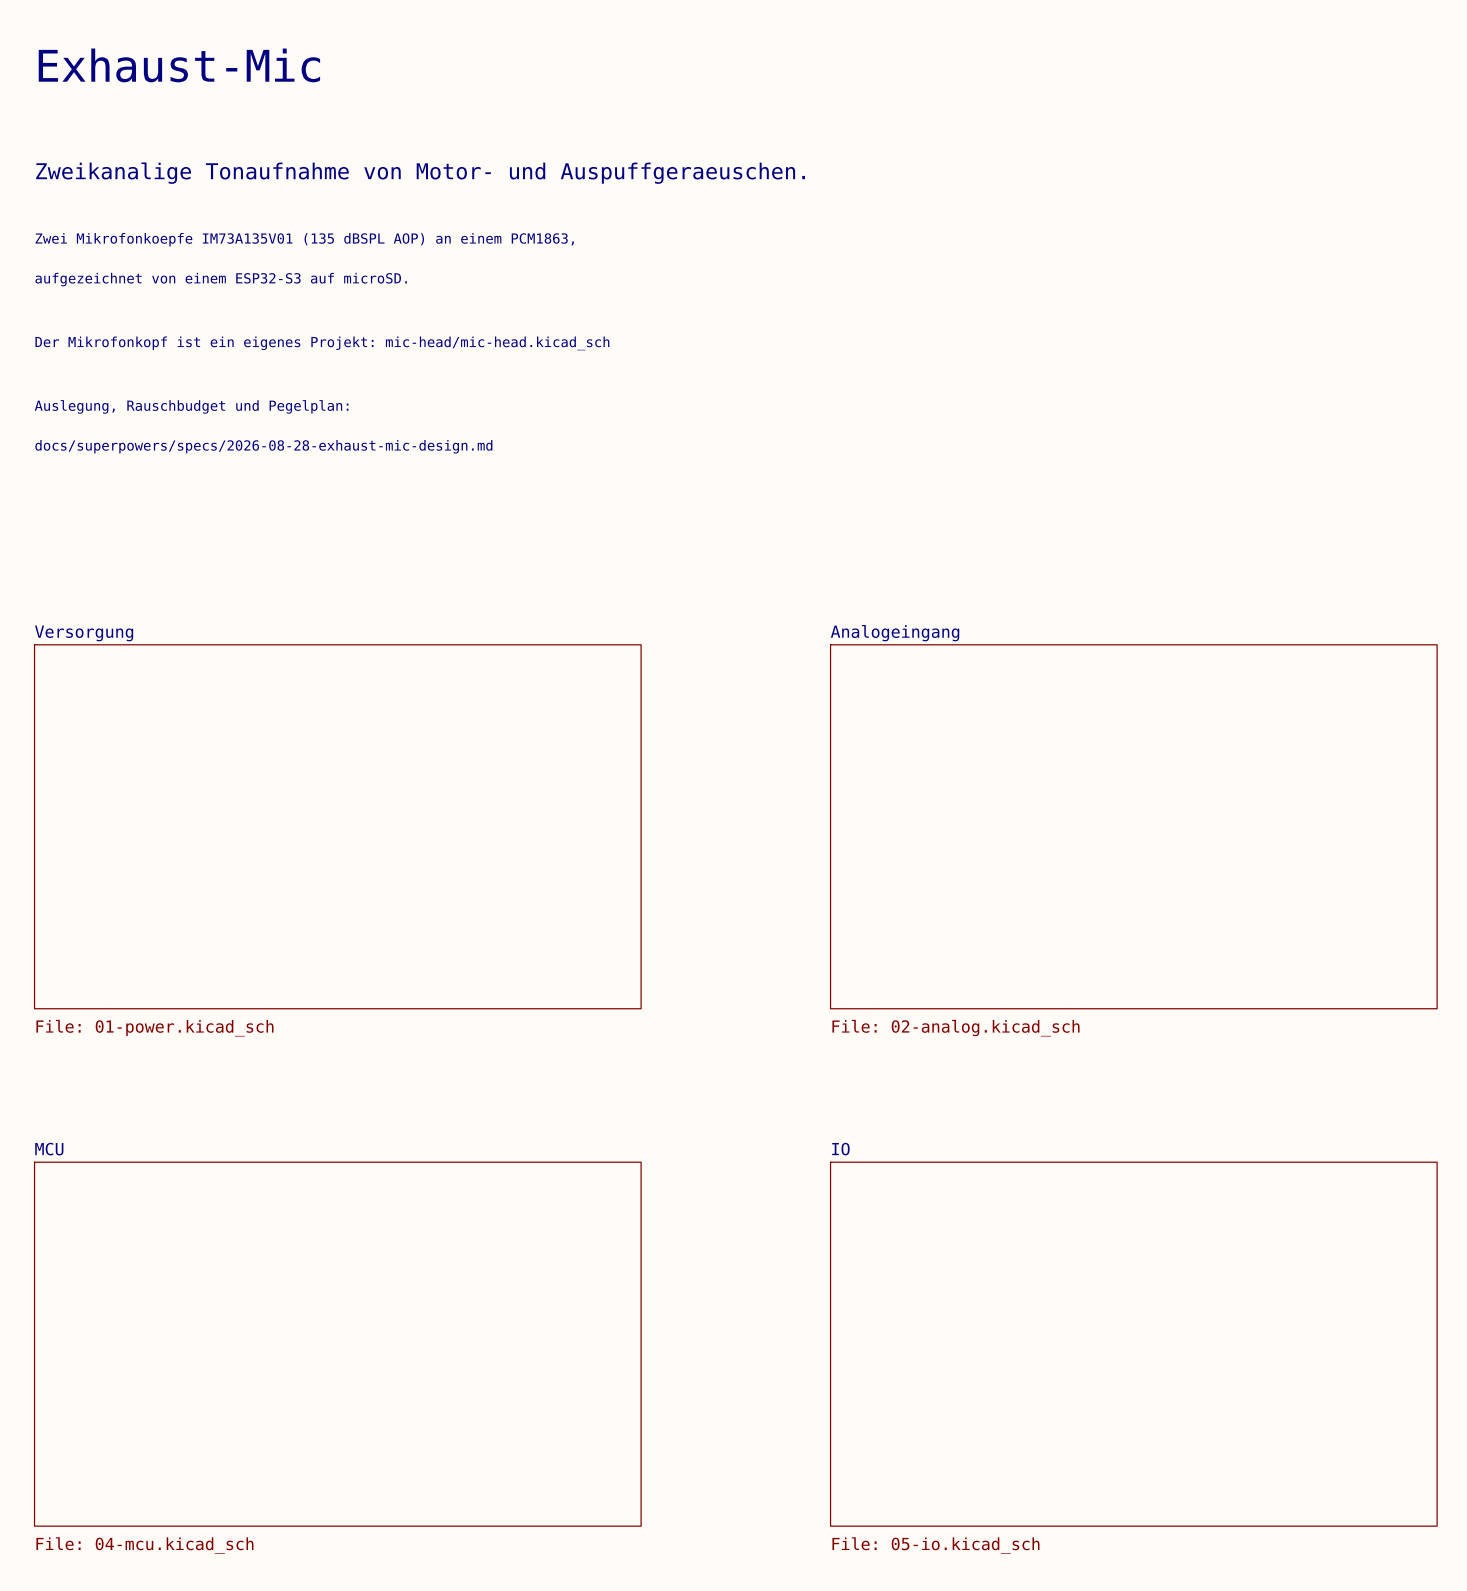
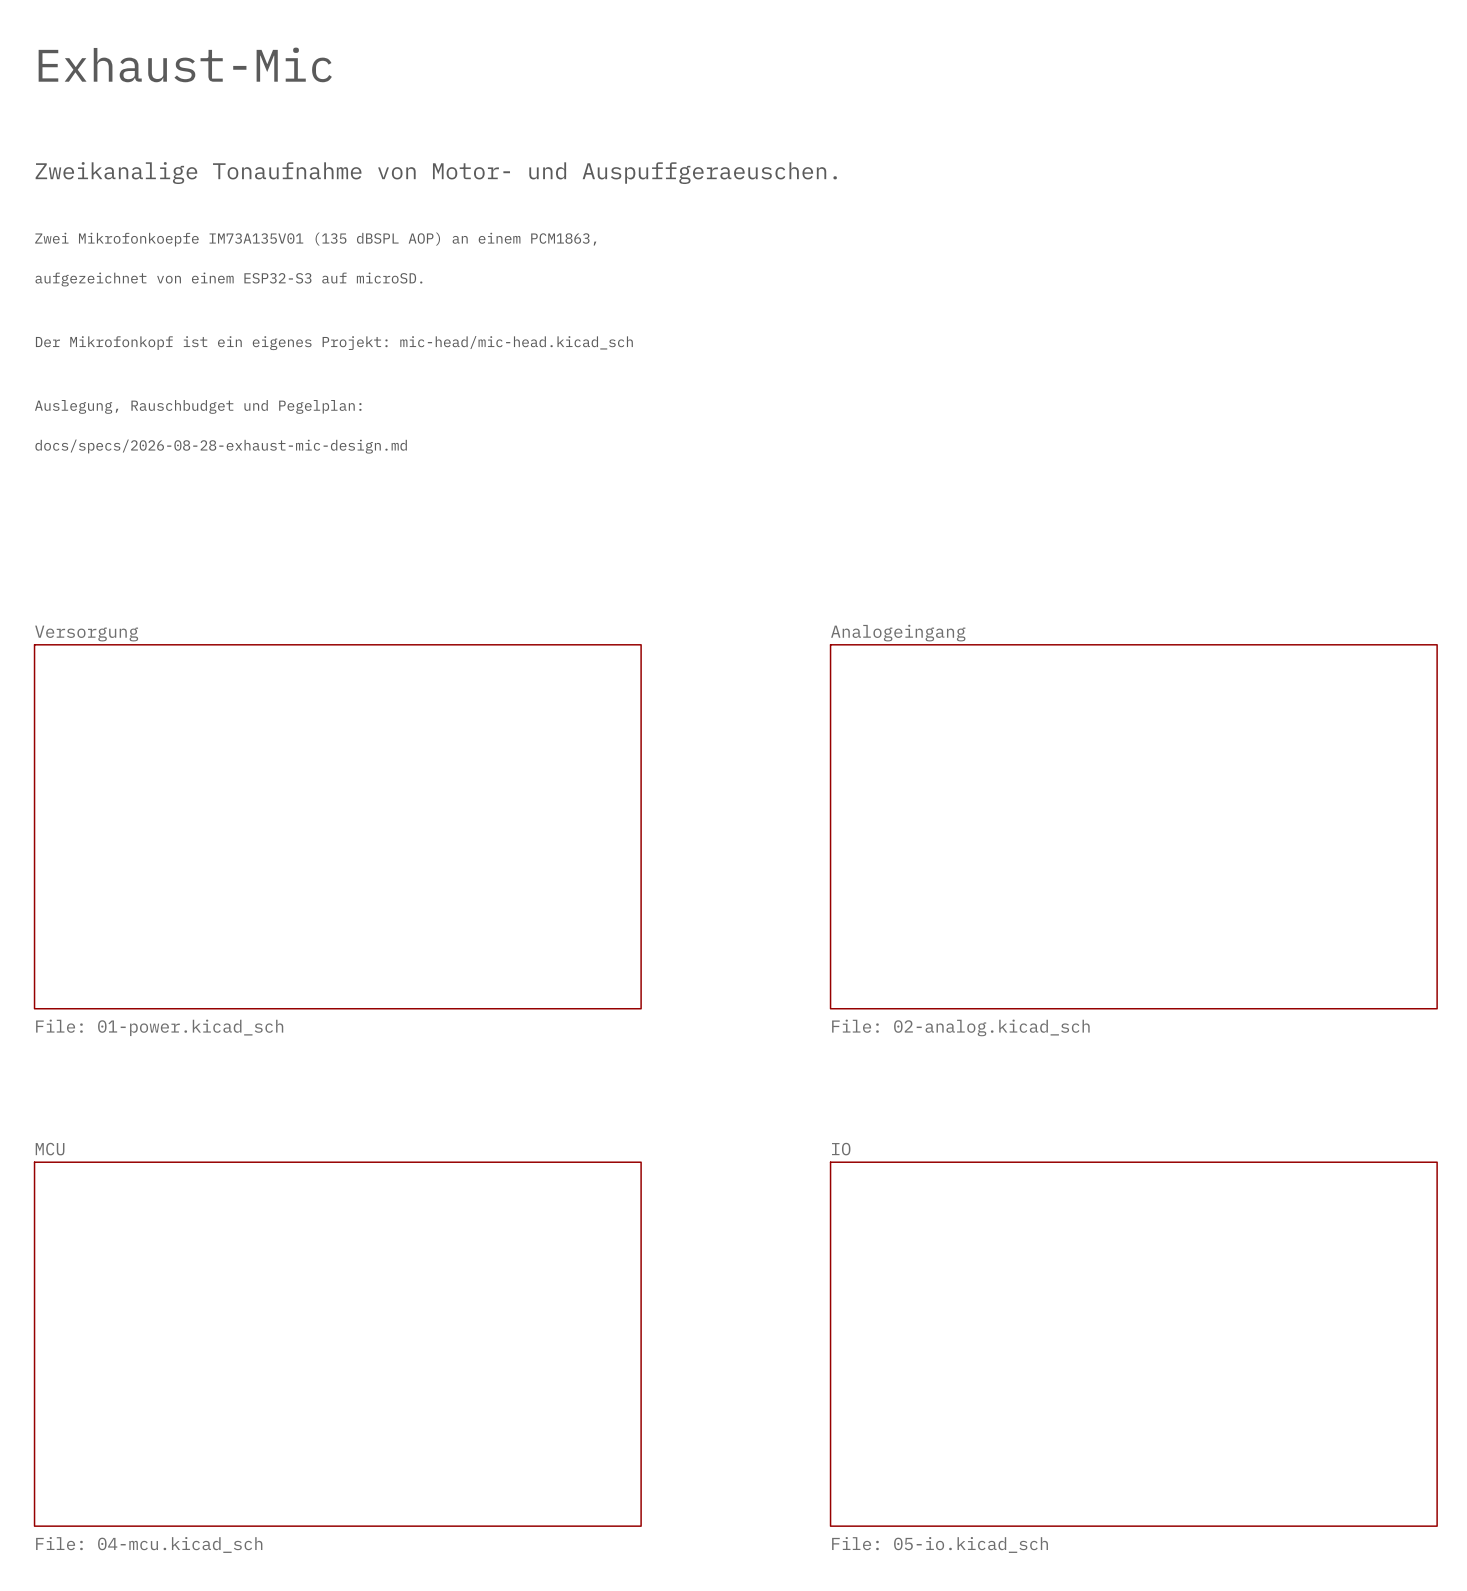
text: docs/superpowers/specs/2026-08-28-exhaust-mic-design.md (263, 446) -> docs/specs/2026-08-28-exhaust-mic-design.md (221, 446)

